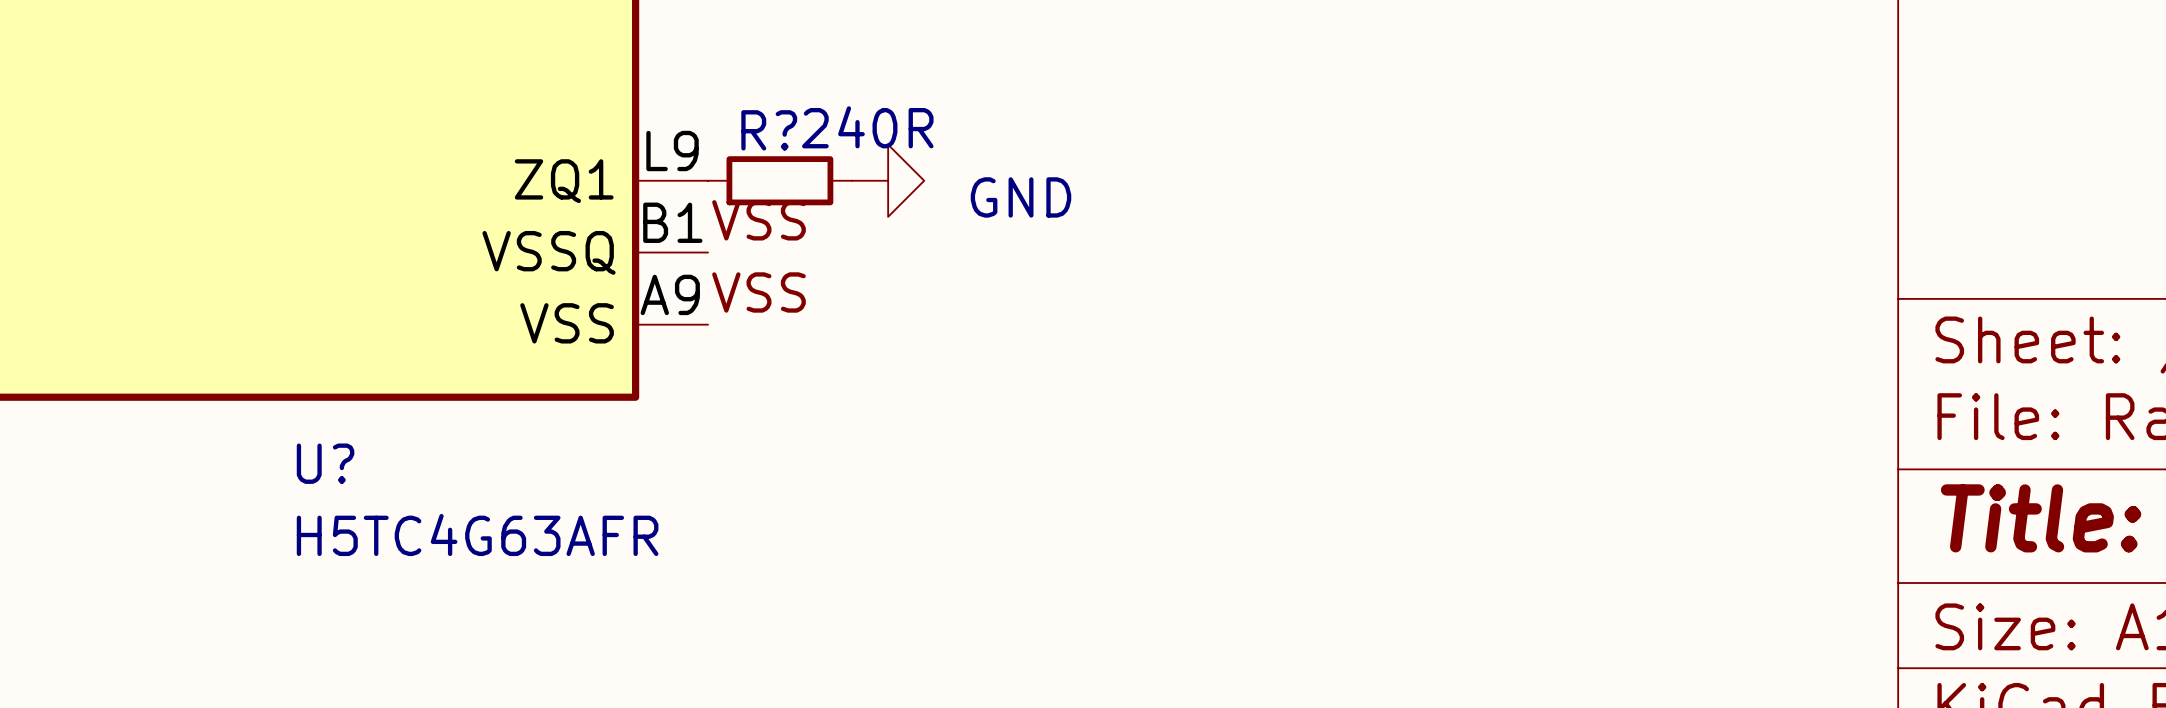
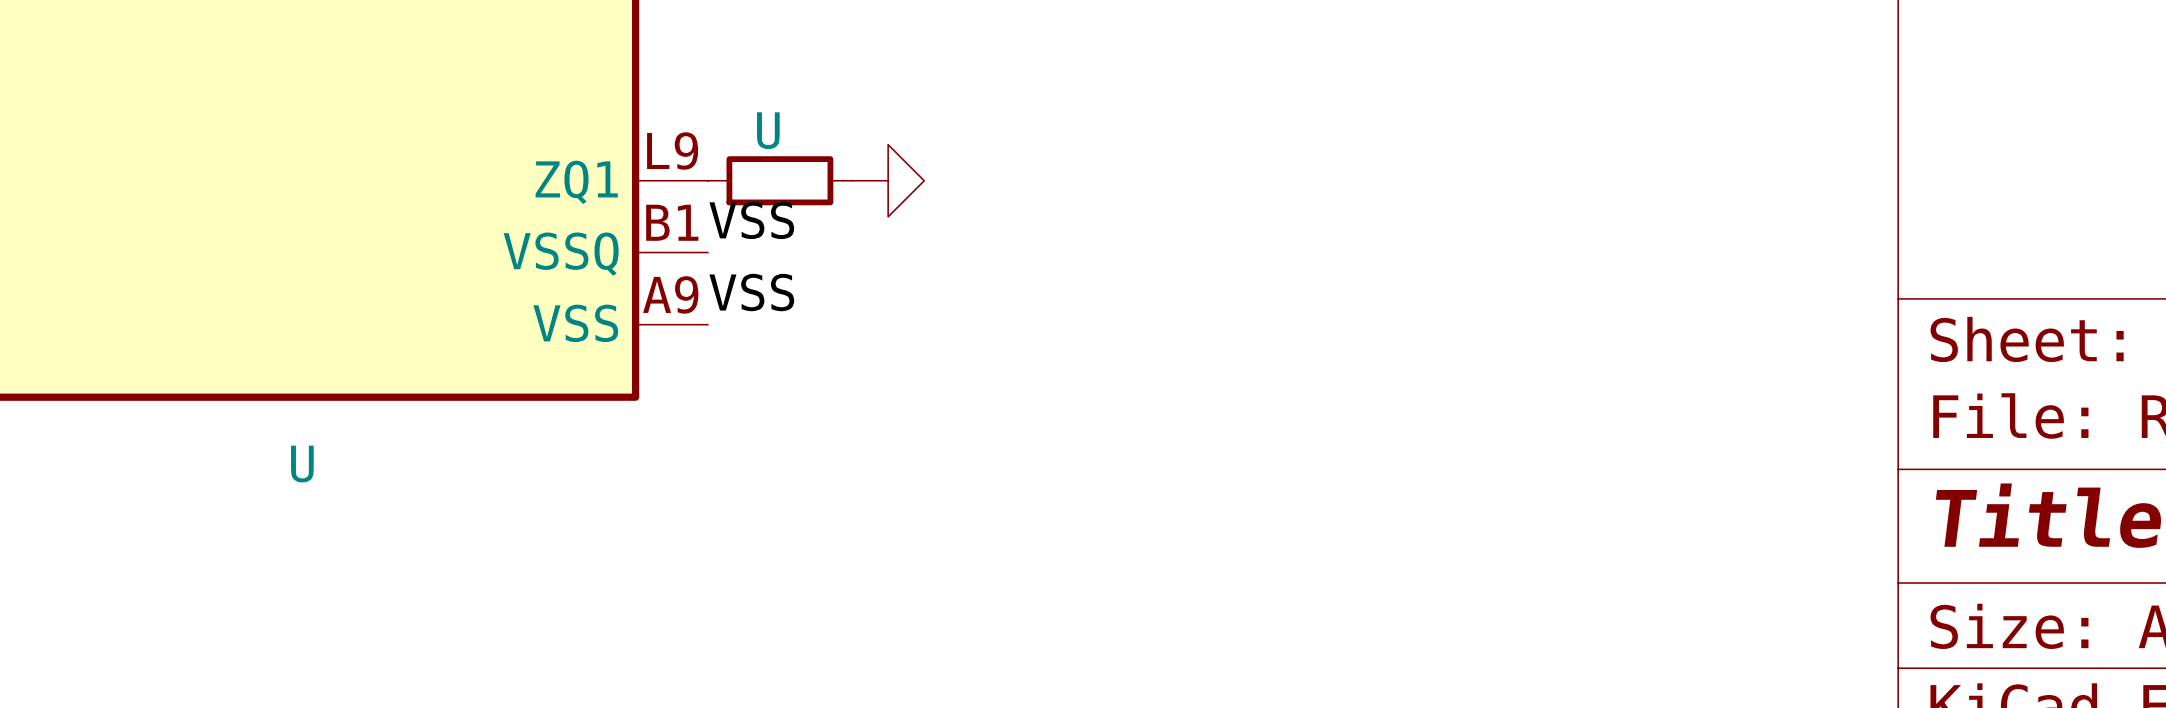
R? value: 240R (867, 127) -> none
R? name: R? (769, 130) -> U (768, 130)
power symbol text: GND (1021, 197) -> none
U? name: U? (325, 463) -> U (302, 464)
U? value: H5TC4G63AFR (477, 534) -> none

